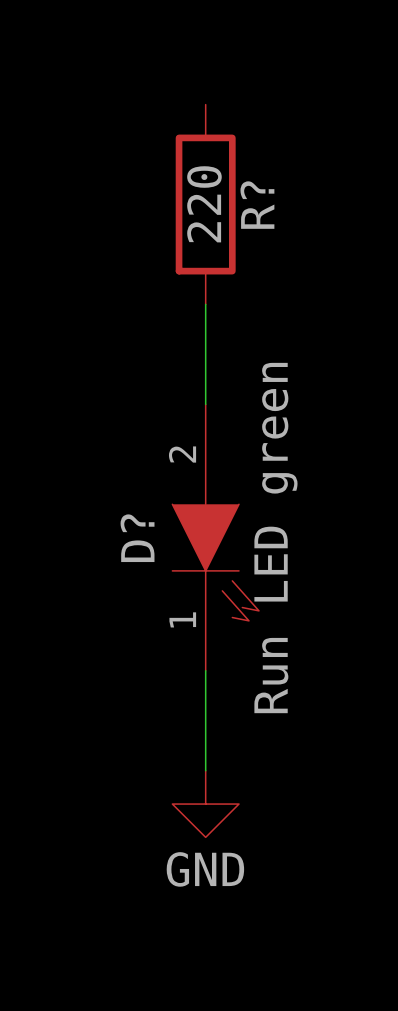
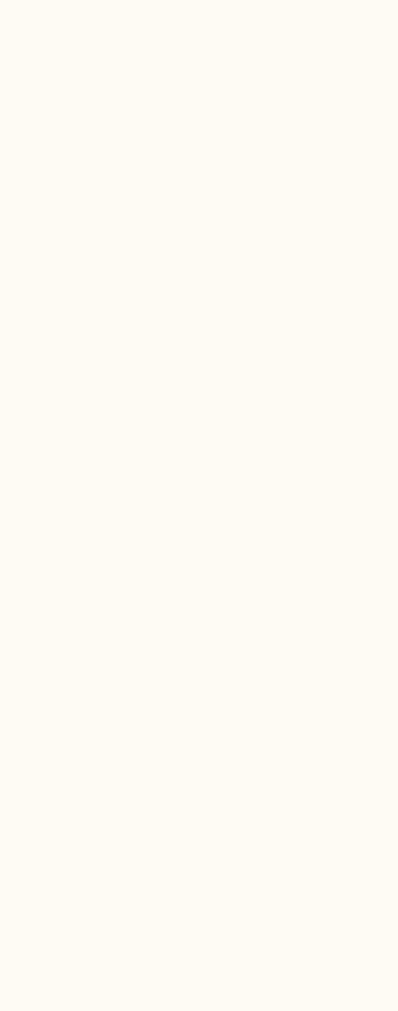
R?: 220 (205, 204) -> none
wire: (205, 304) (205, 404) -> none
D?: Run LED green (215, 537) -> none
wire: (205, 670) (205, 770) -> none
power symbol: GND (205, 804) -> none

